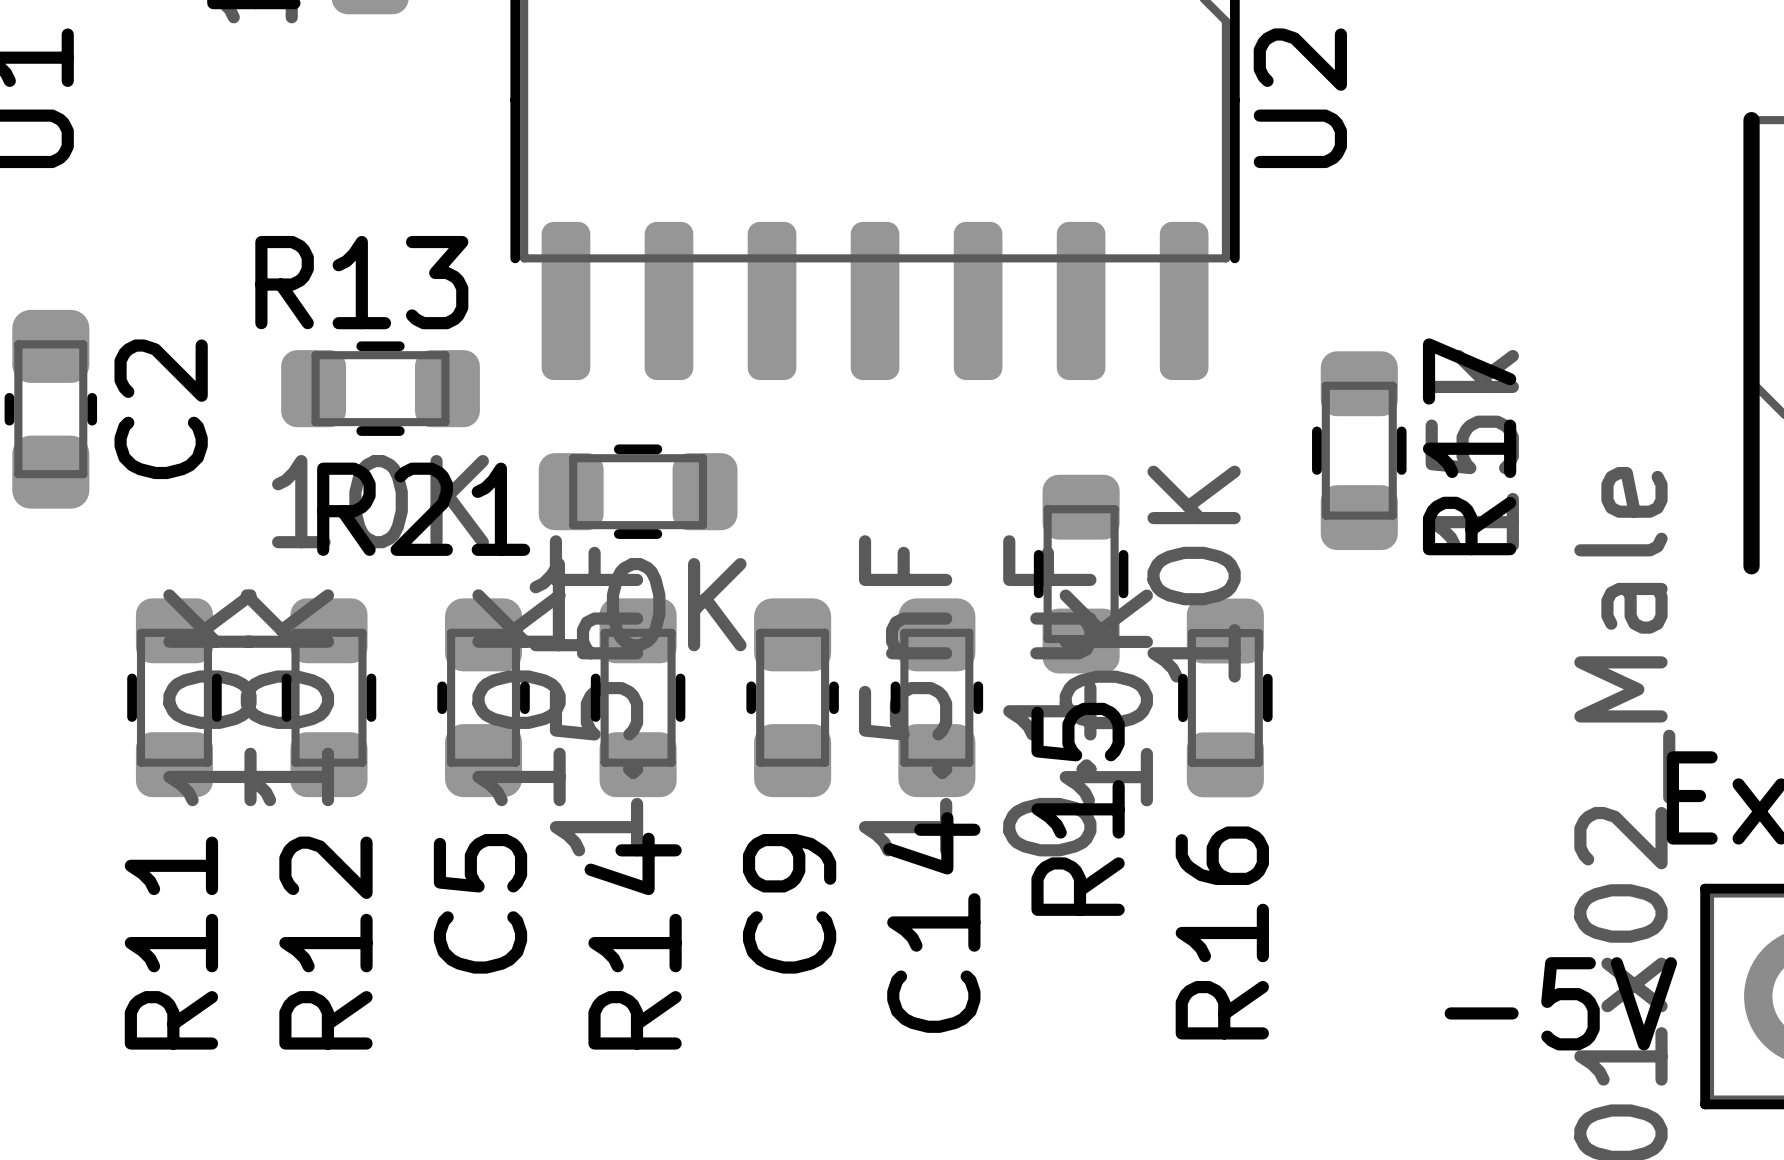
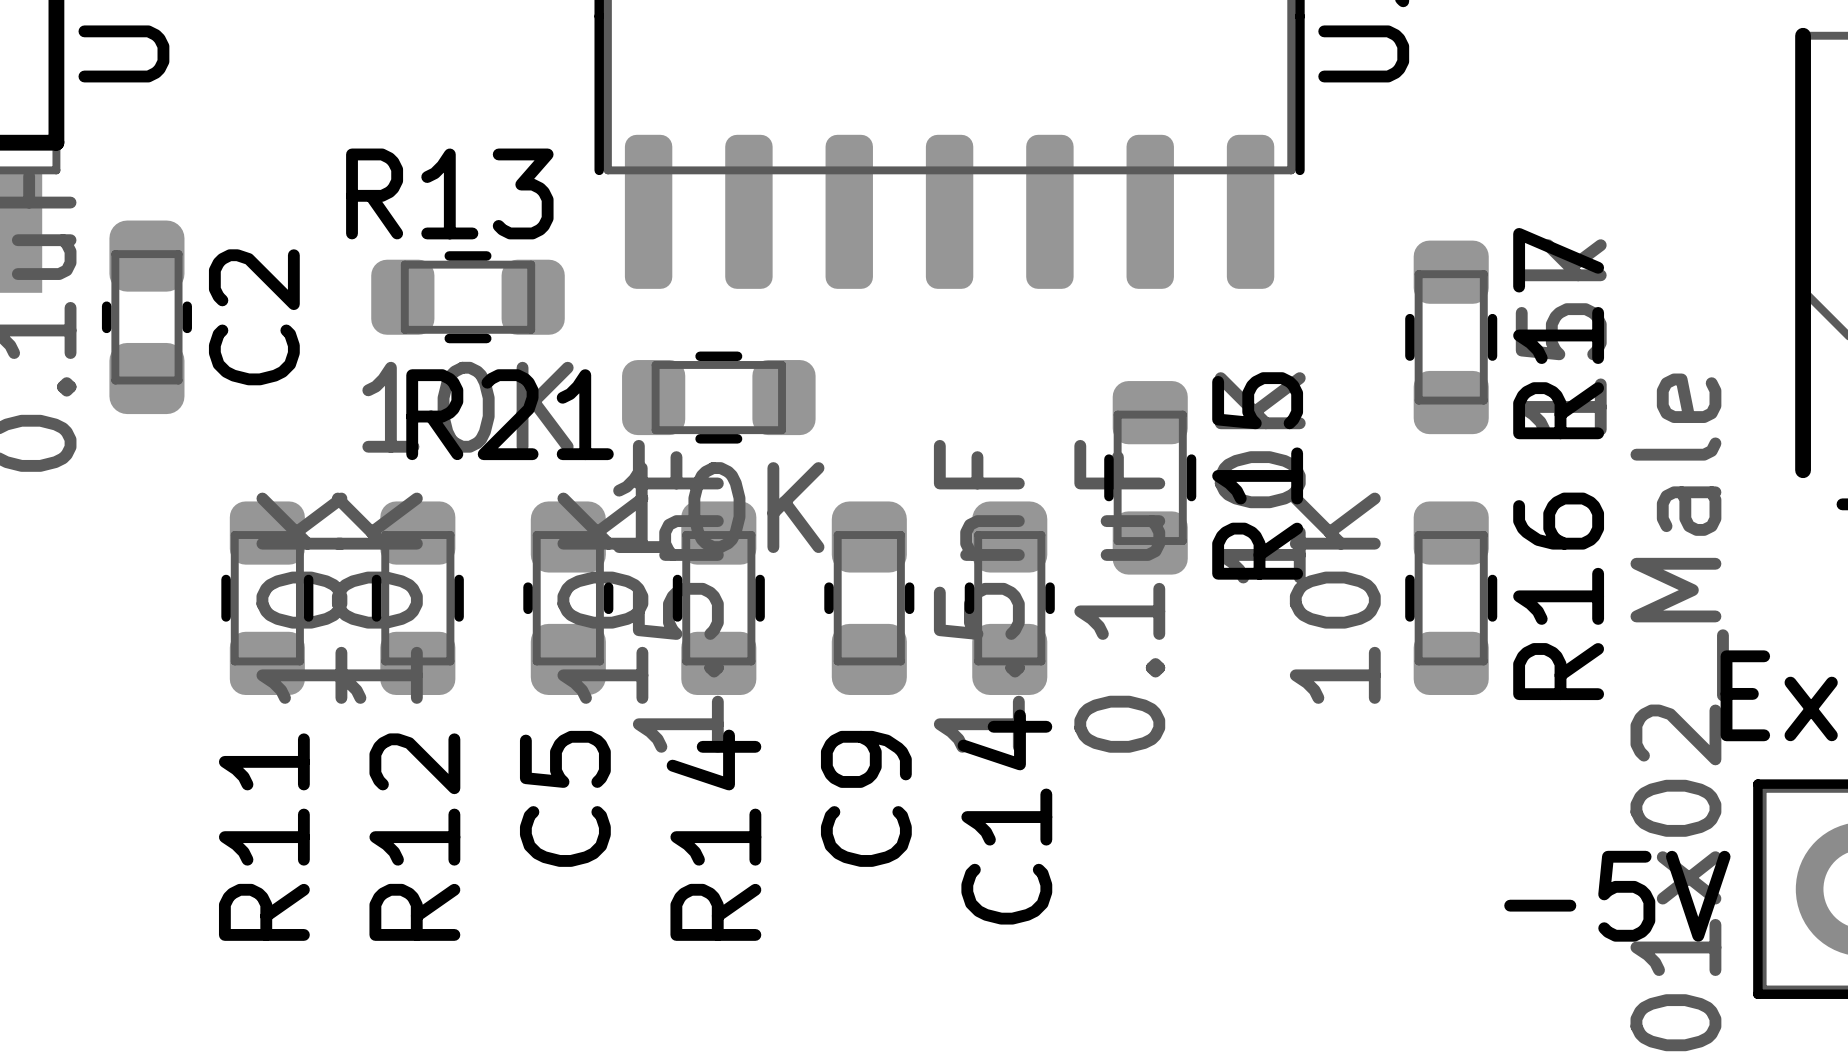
R17 position: (1359, 450) -> (1451, 337)
R16 position: (1225, 697) -> (1451, 598)
R15 name position: R15 (1078, 809) -> R15 (1257, 475)
R16 name position: R16 (1222, 932) -> R16 (1558, 596)

